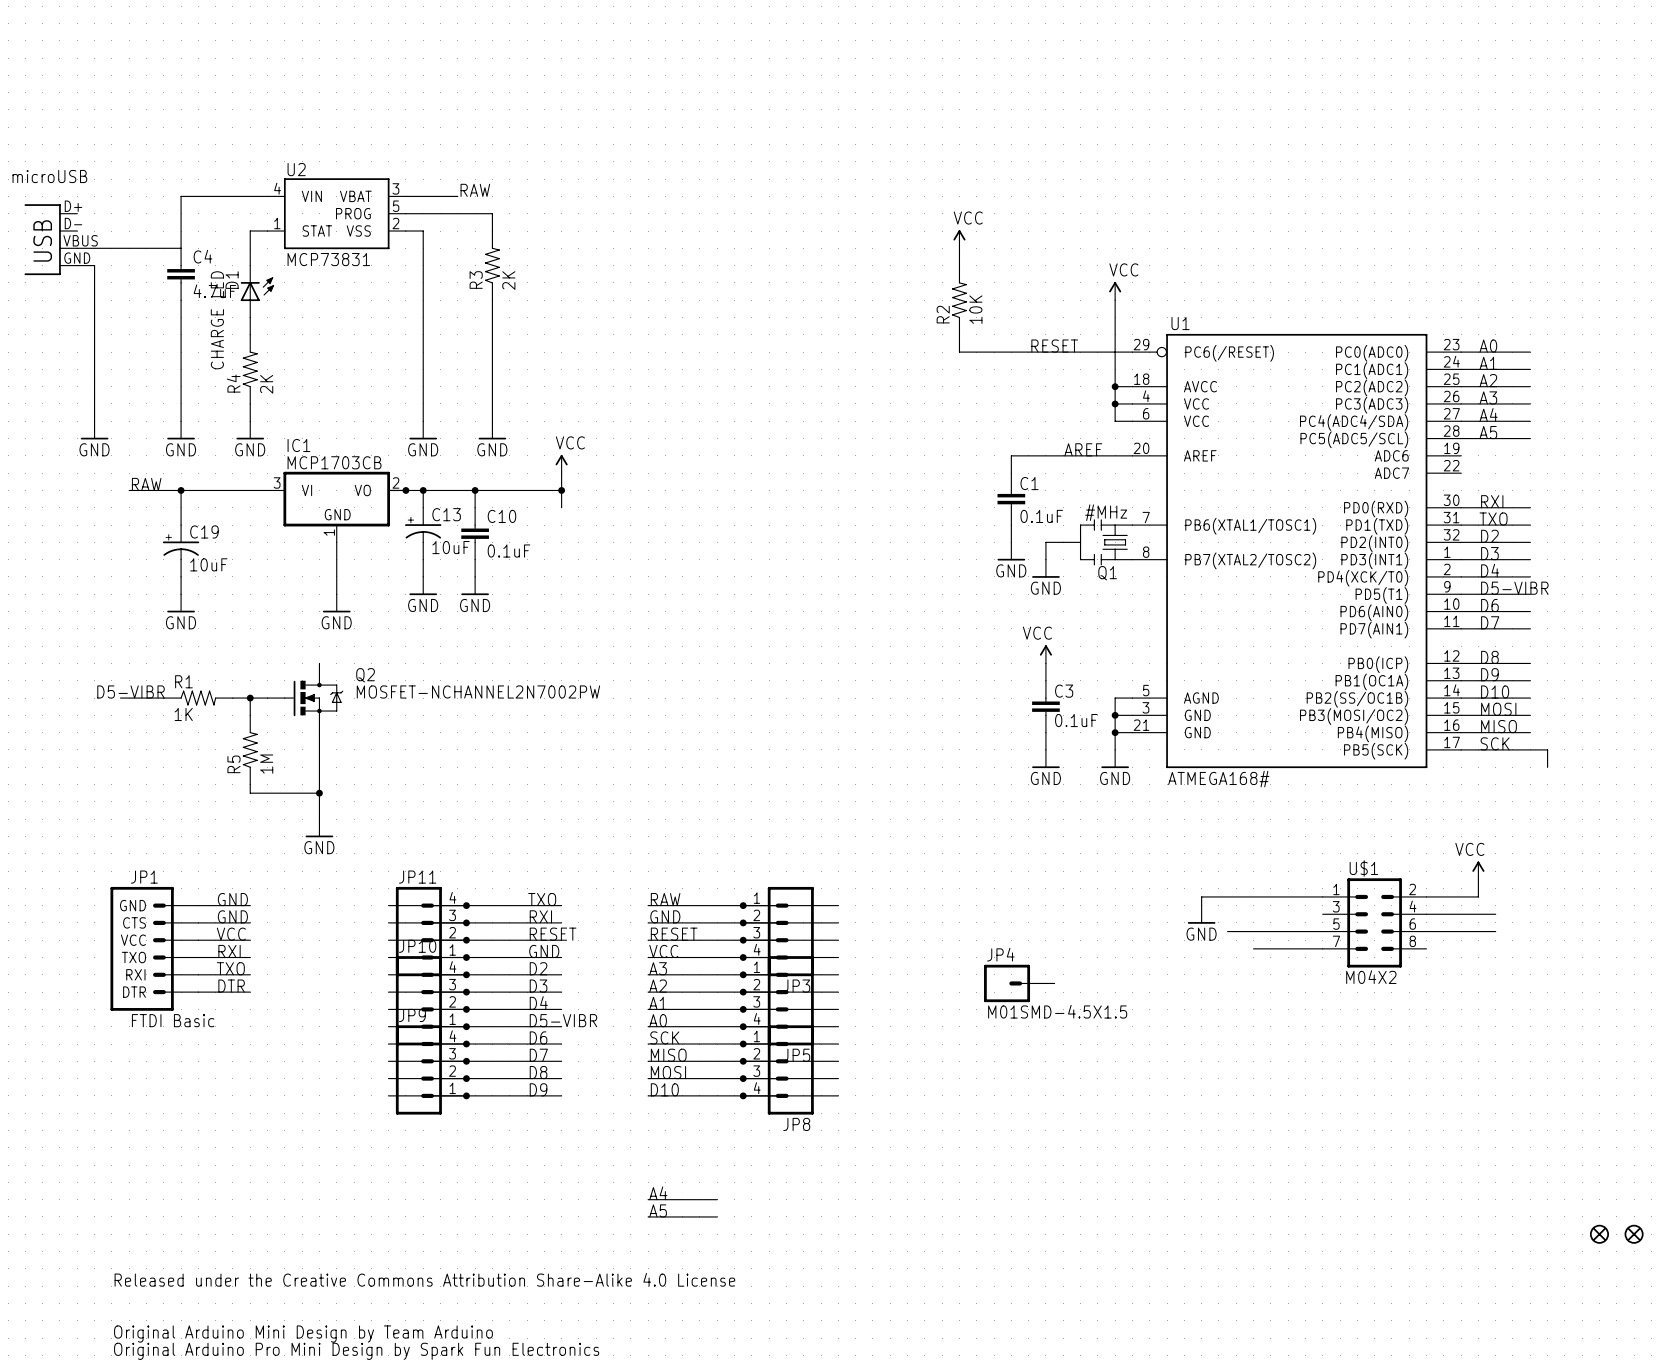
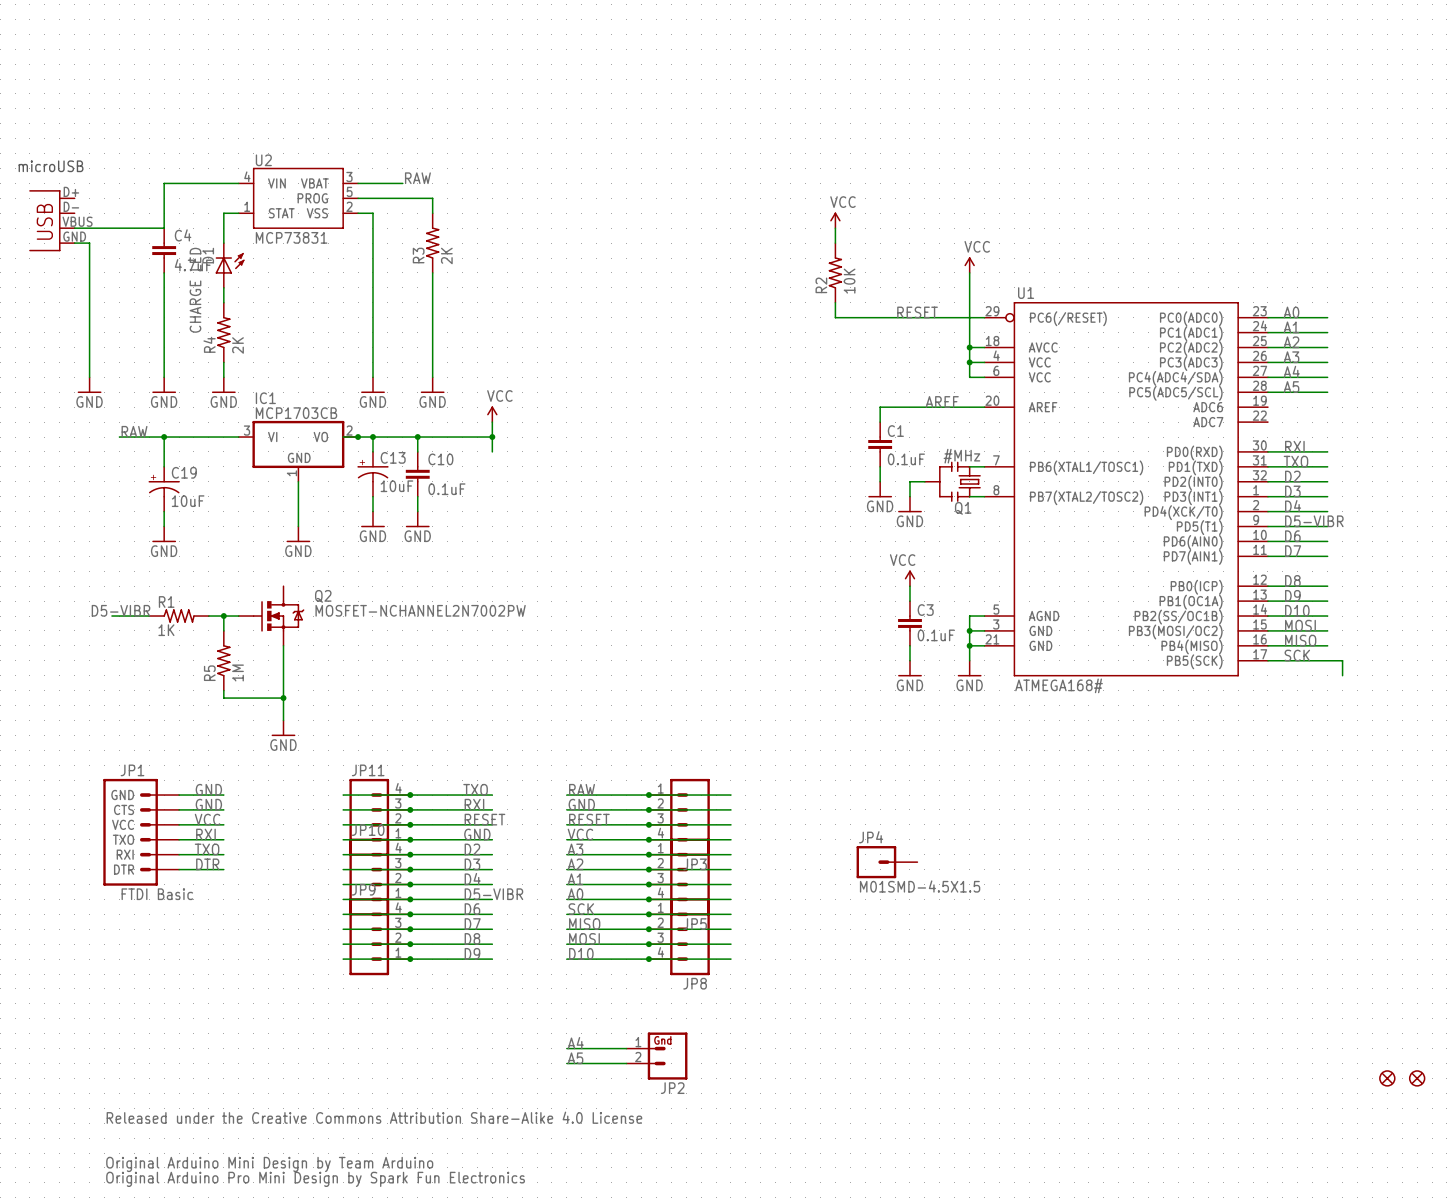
power symbol: VCC (1478, 870) -> none
wire: (1478, 879) (1478, 896) (1426, 896) -> none
wire: (1322, 896) (1201, 896) (1201, 905) -> none
power symbol: GND (1201, 914) -> none
wire: (1426, 914) (1495, 914) -> none
U$1: M04X2 (1374, 922) -> none
wire: (1227, 931) (1322, 931) -> none
wire: (1426, 931) (1495, 931) -> none
wire: (1253, 948) (1322, 948) -> none
JP2: none -> (657, 1056)

